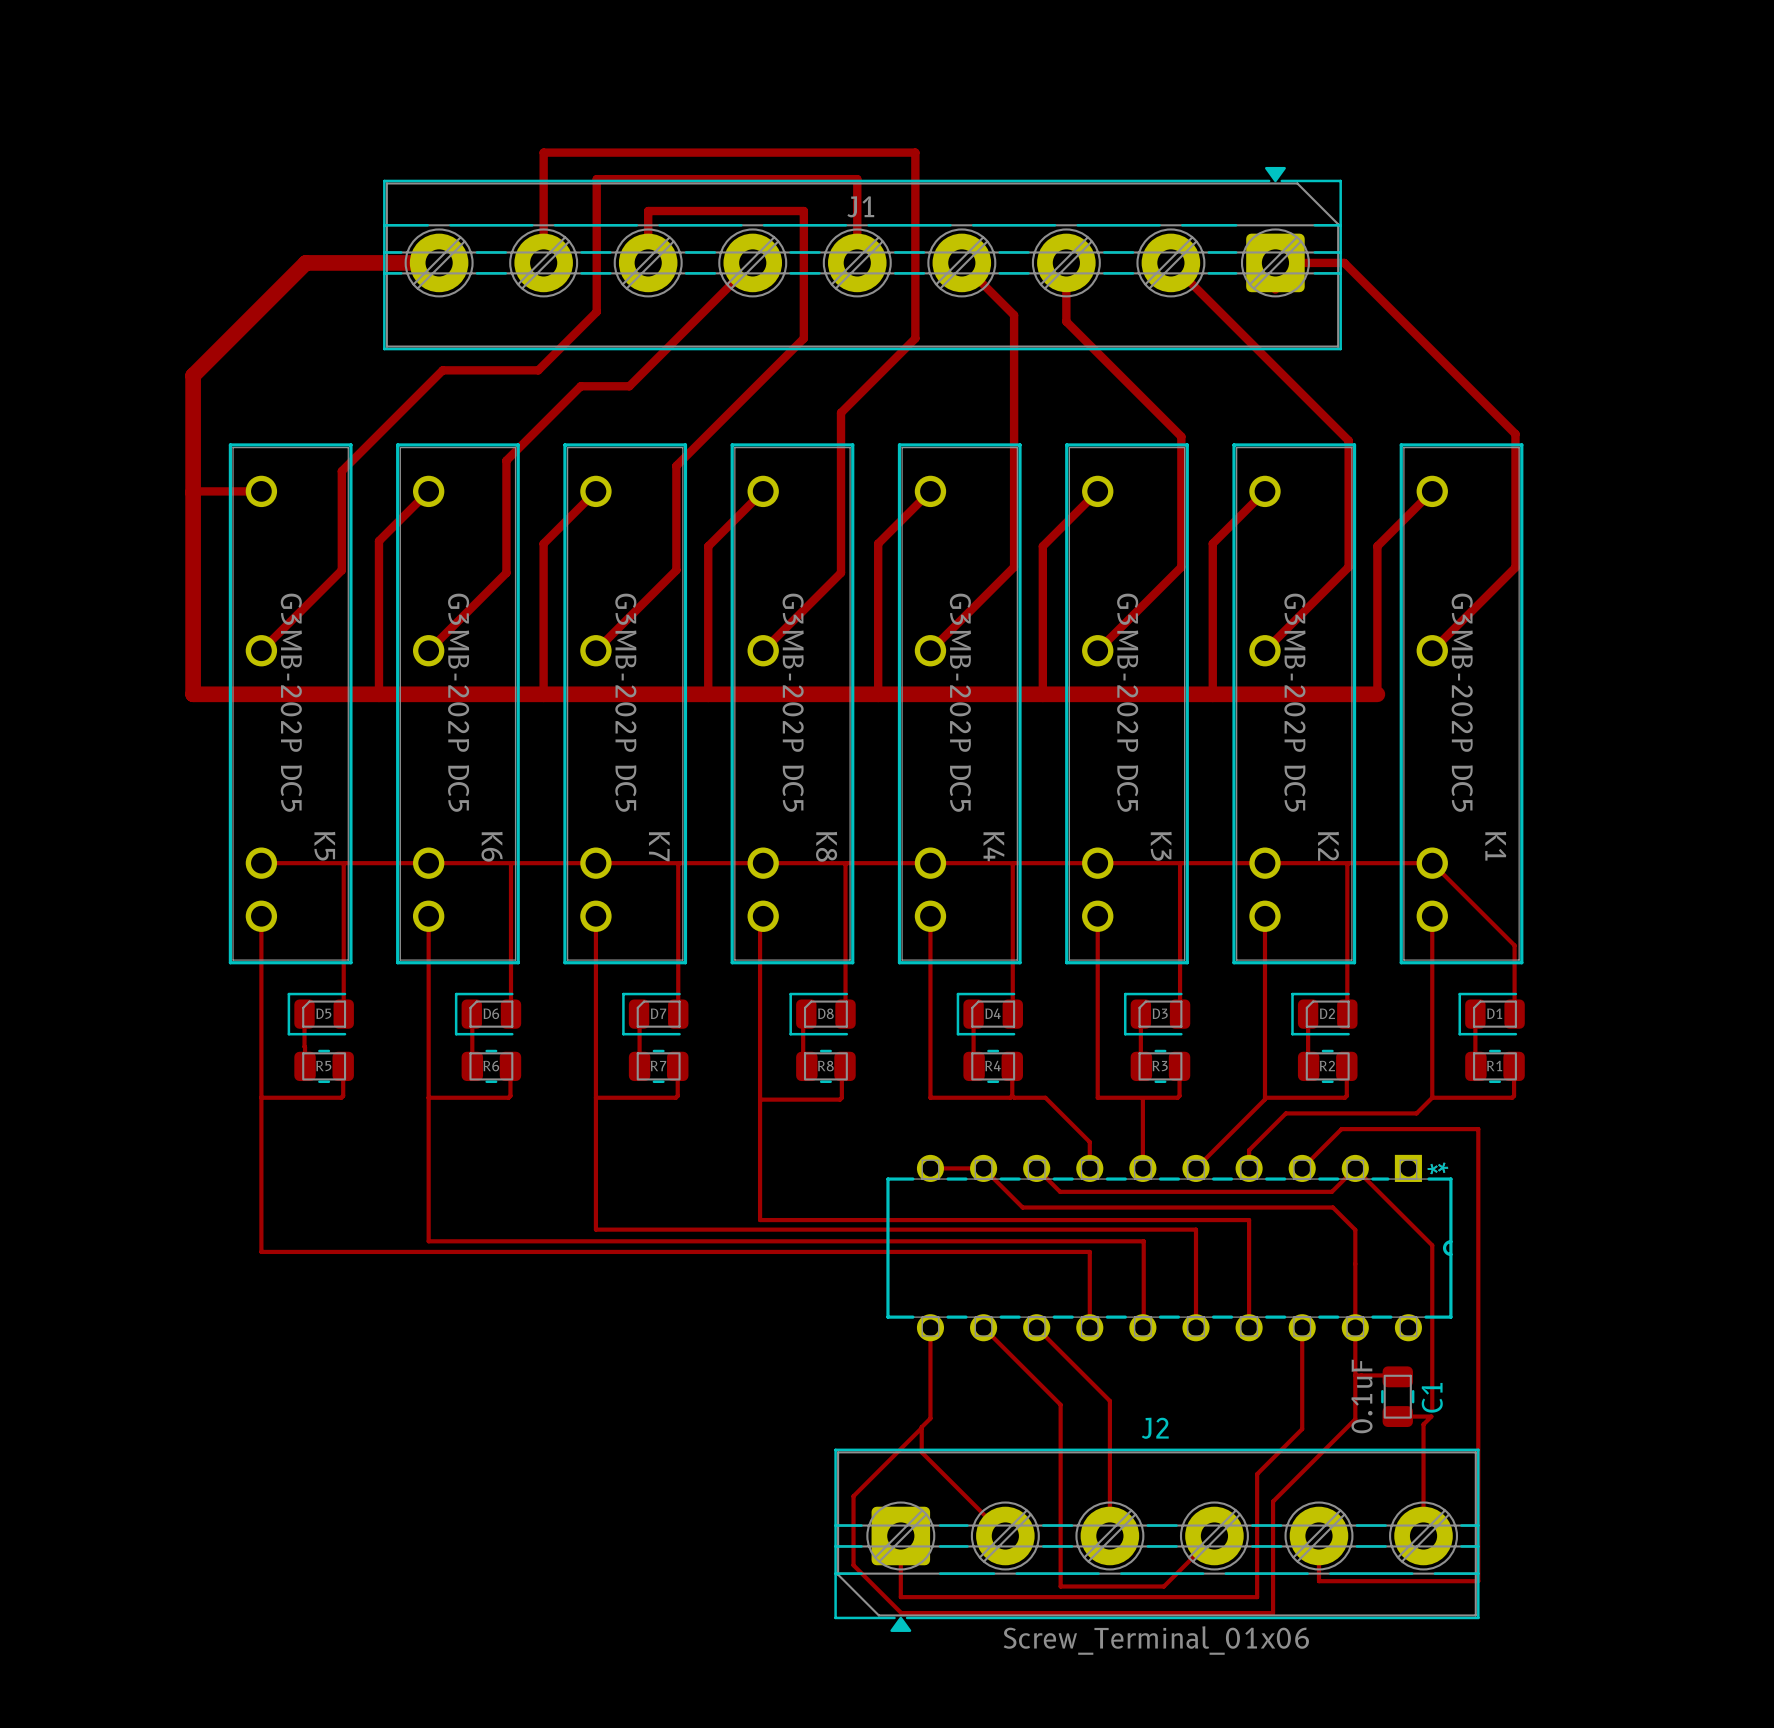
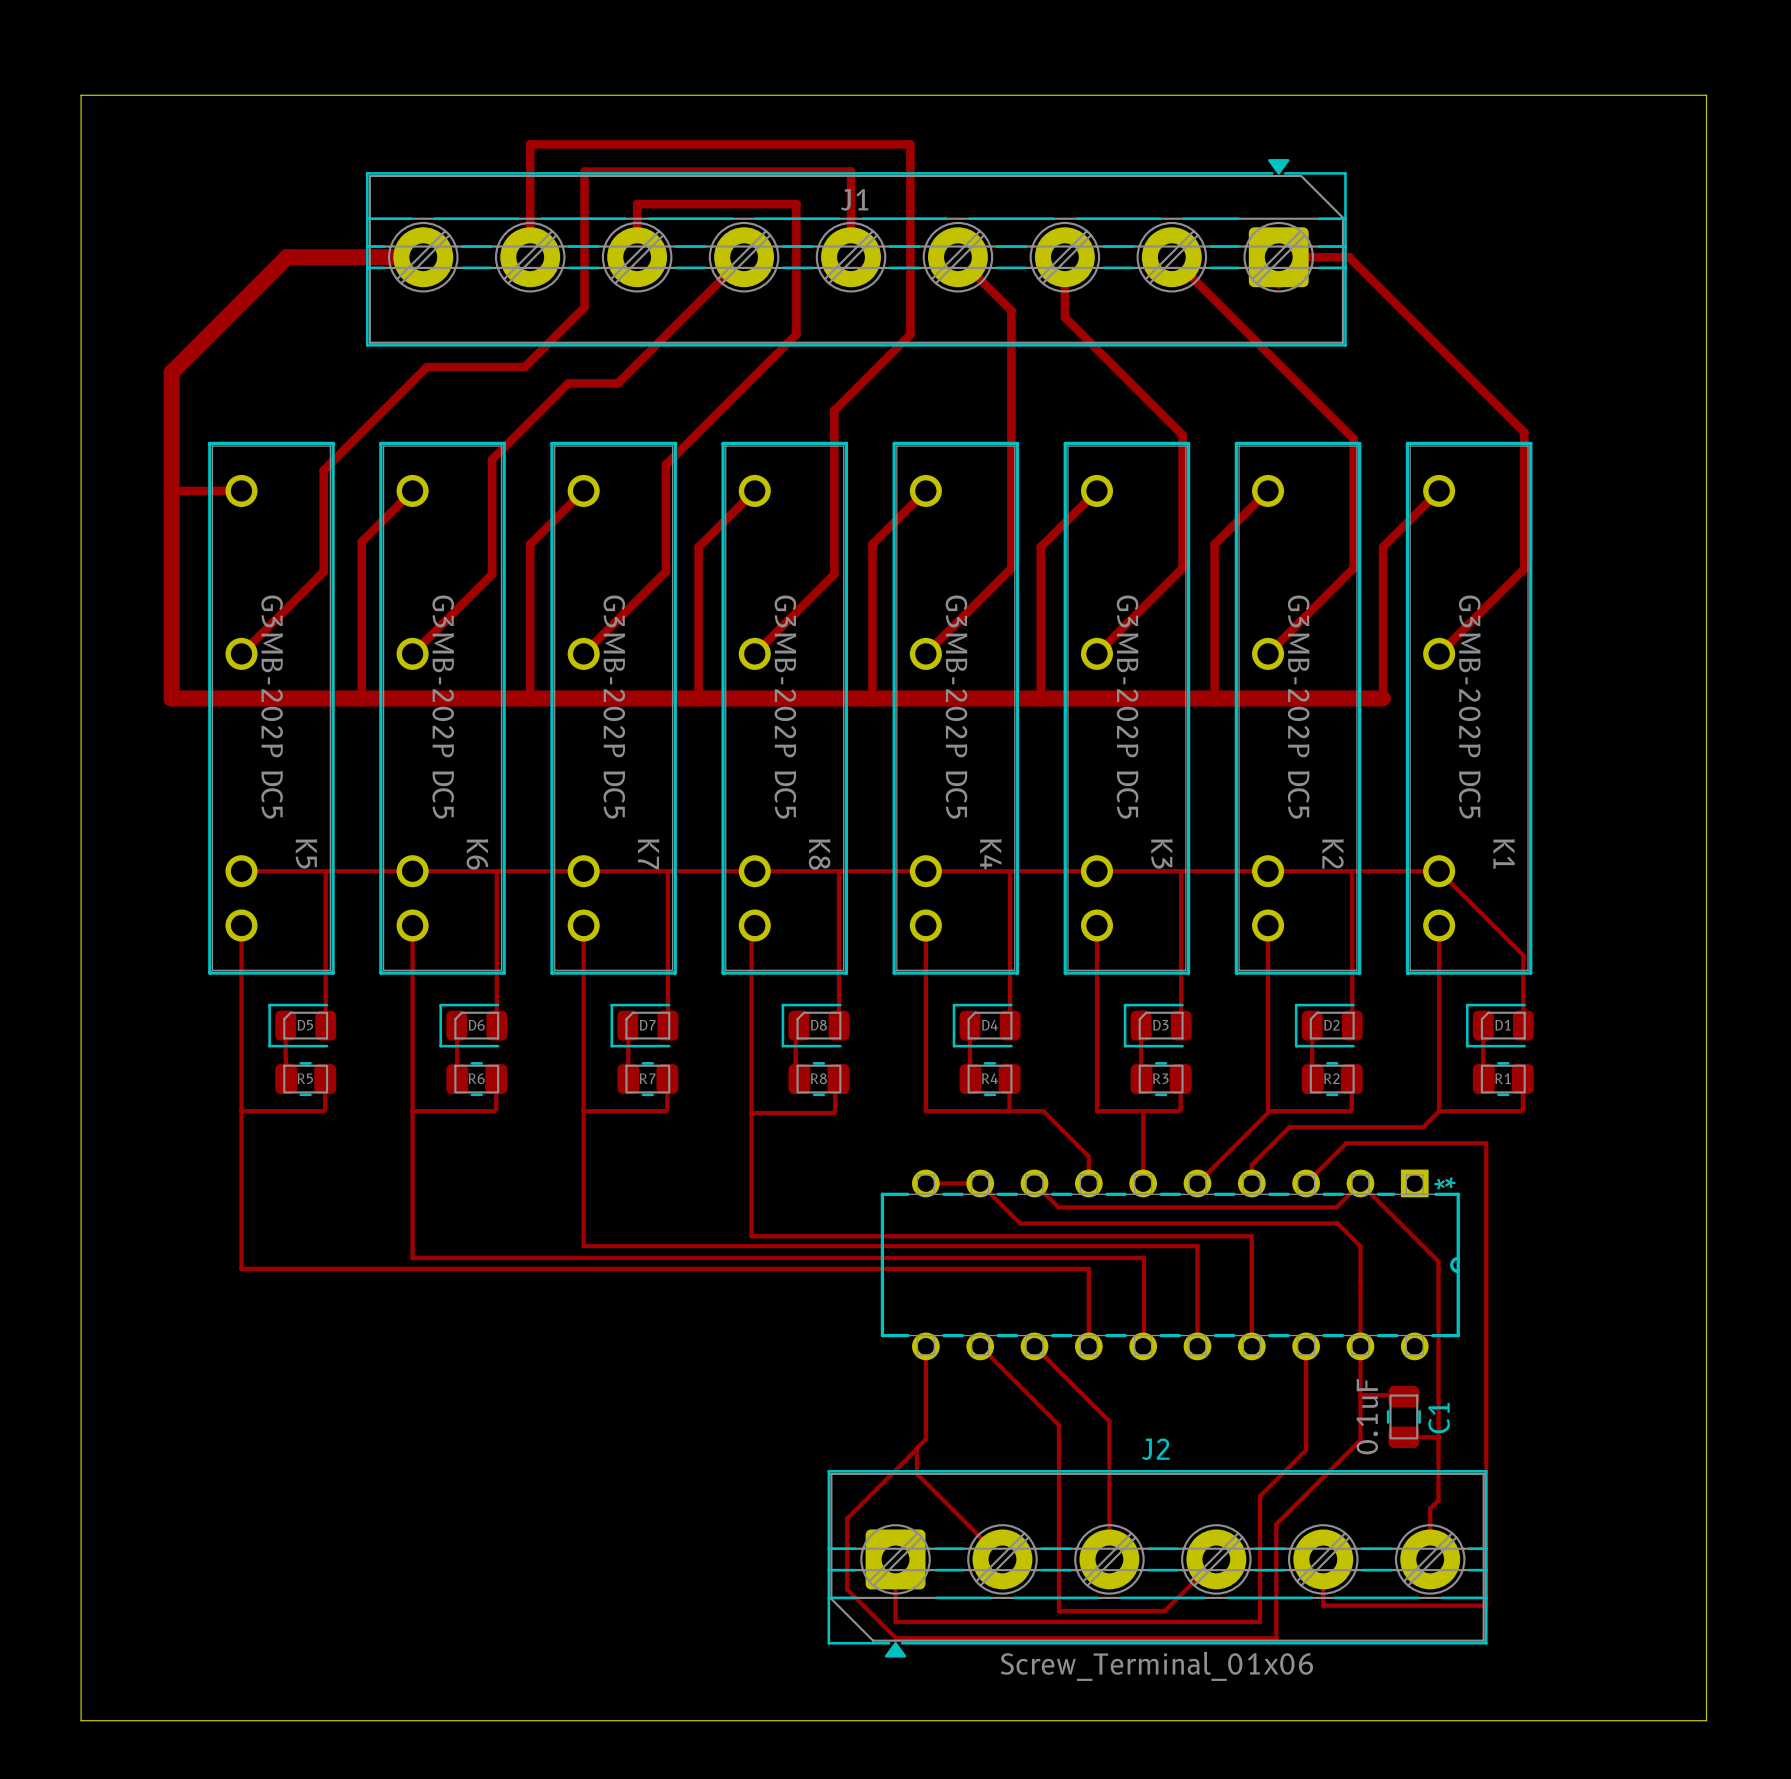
board edge: none -> (81, 95) (1706, 95) (1706, 1720) (81, 1720) (81, 95)
top track: (1431, 1244) (1432, 1409) -> (1438, 1261) (1438, 1500) (1430, 1508)
top track: (1431, 1416) (1423, 1424) (1423, 1486) -> none

